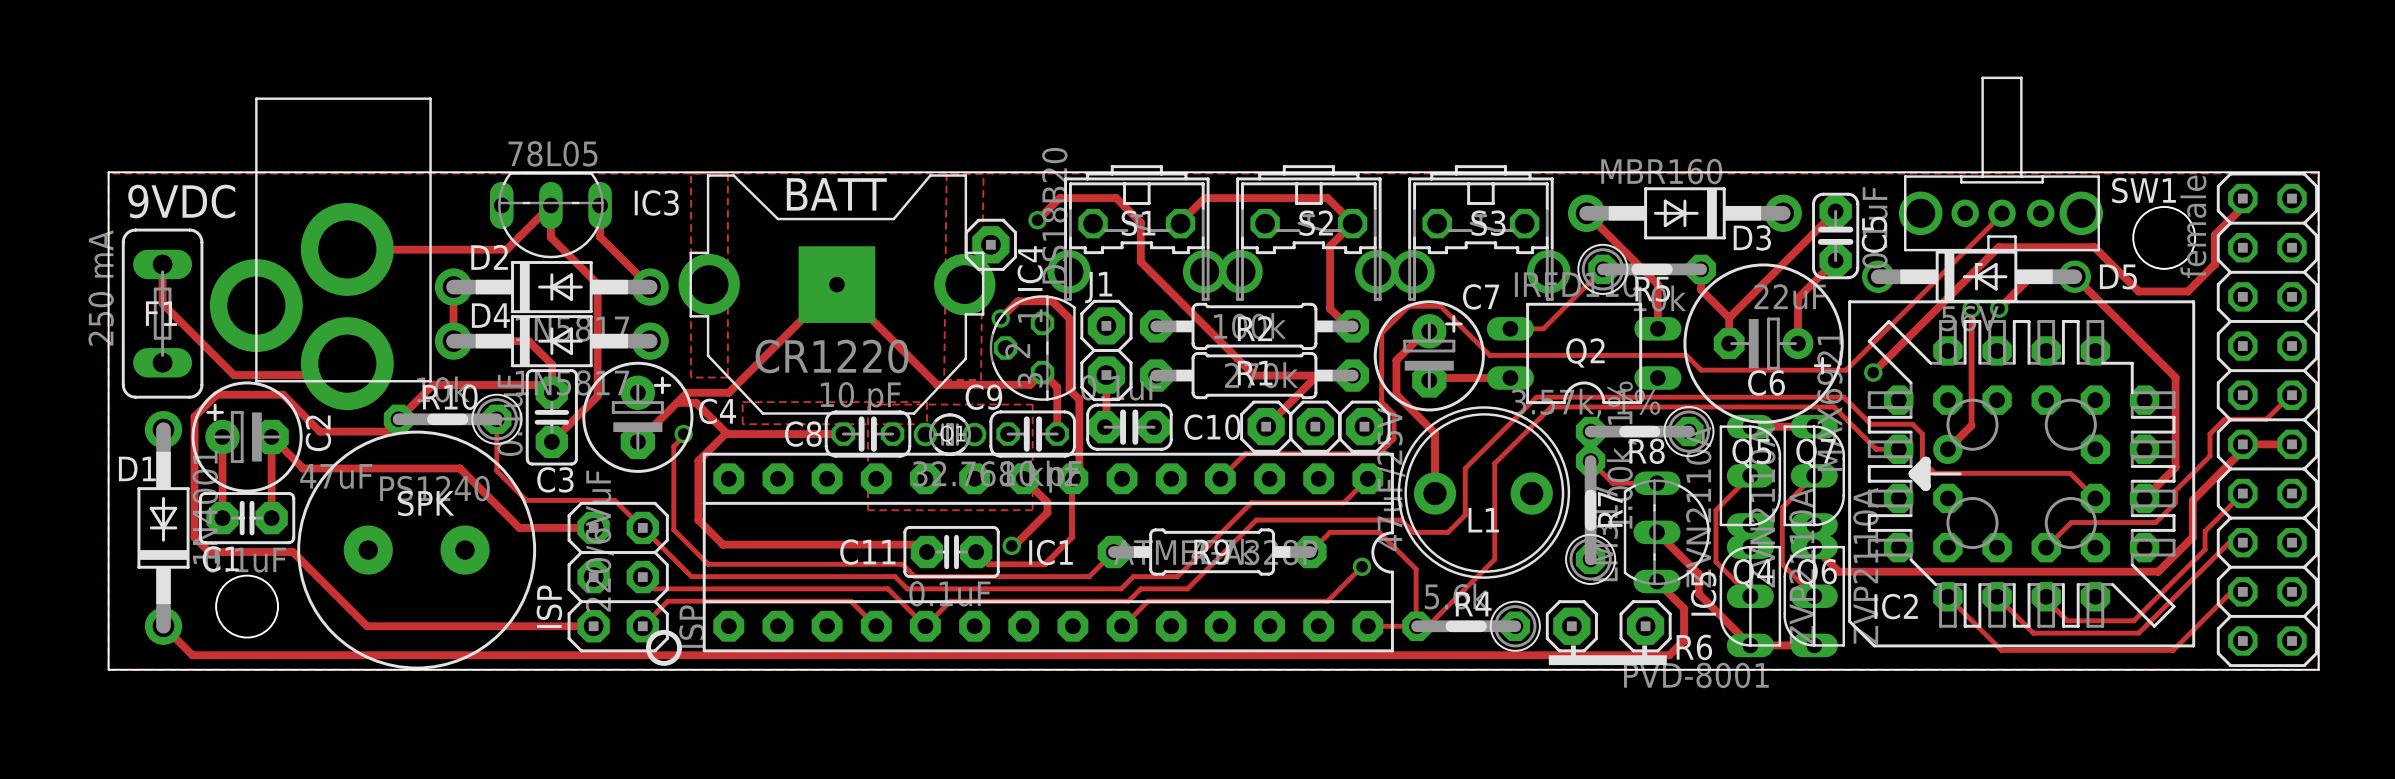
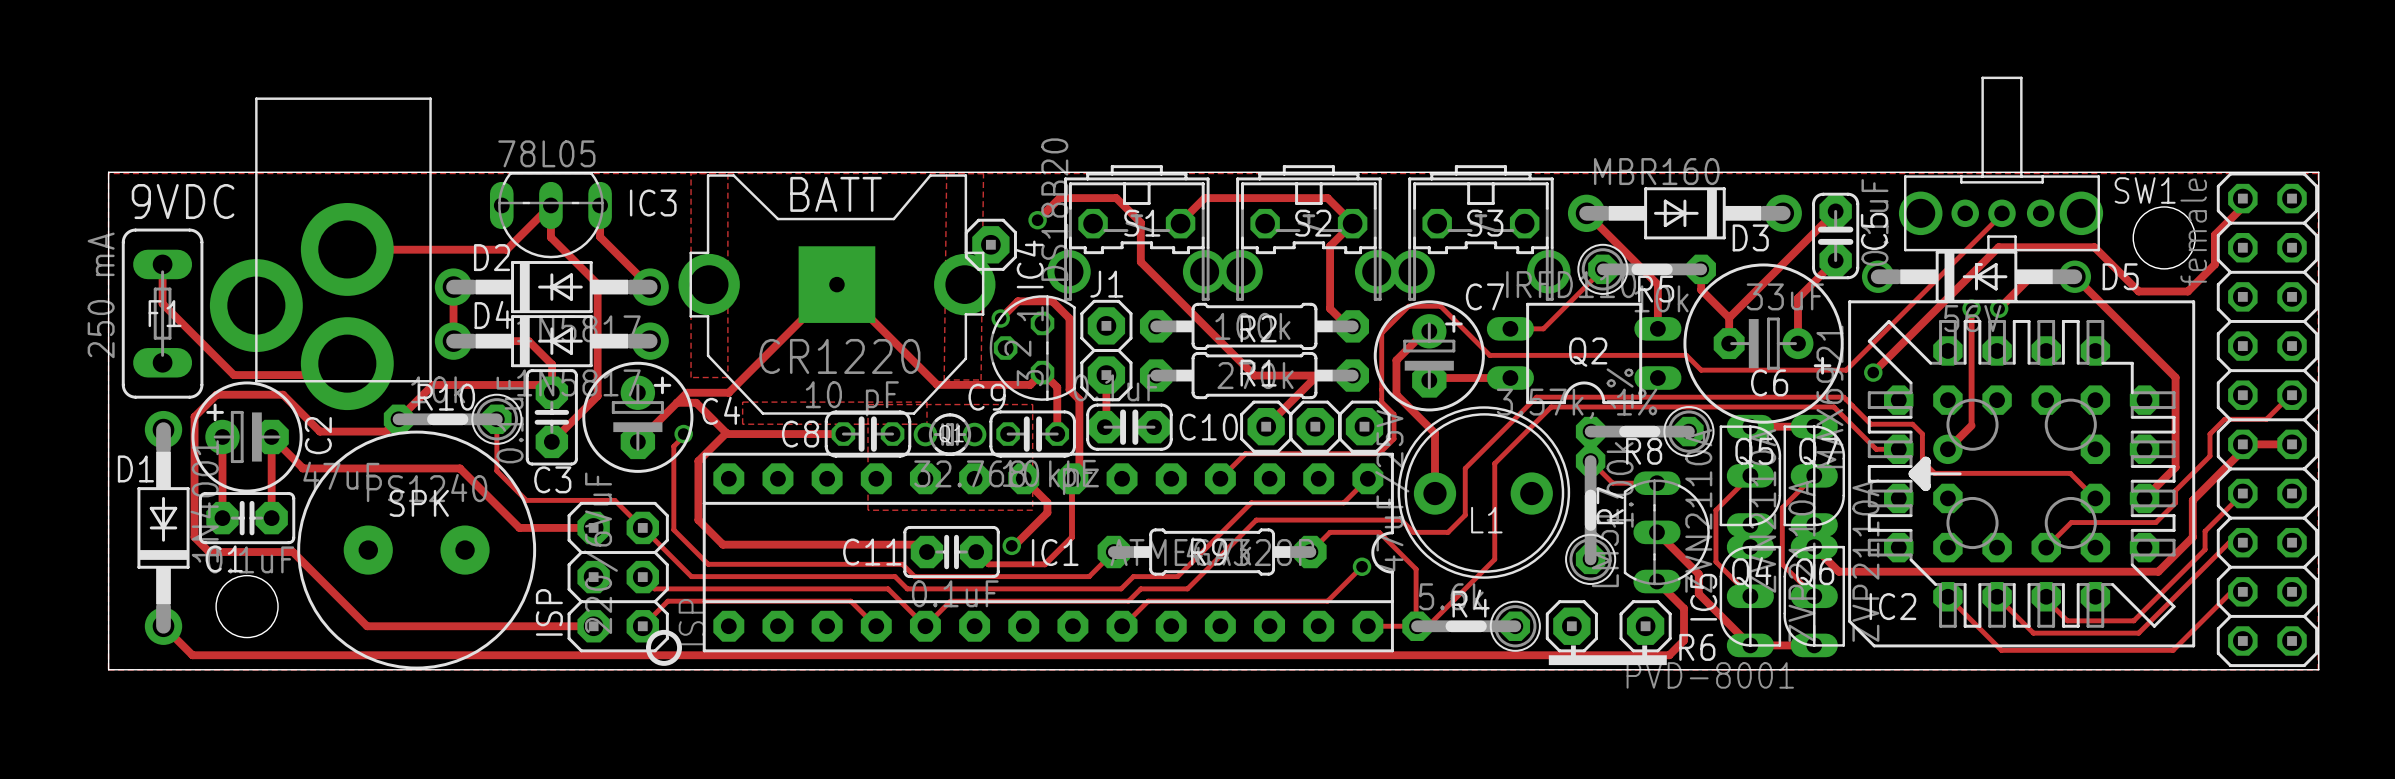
C6 value: 22uF (1790, 296) -> 33uF (1785, 296)

